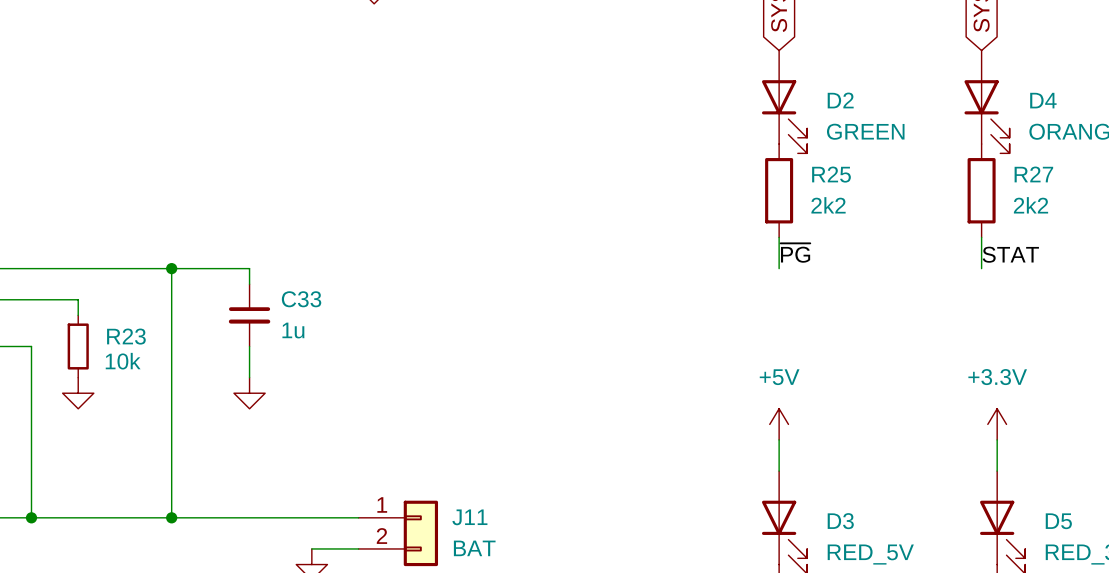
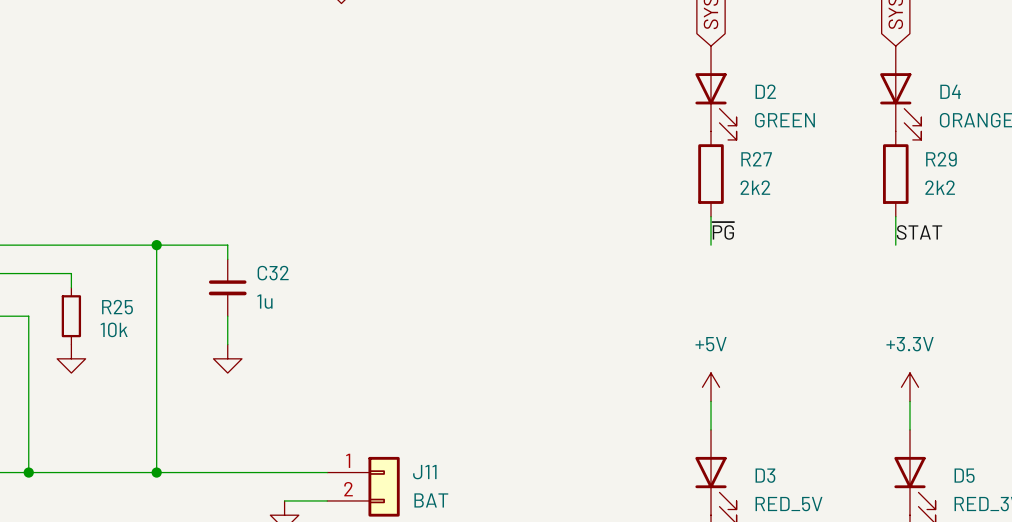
R25 name: R25 (831, 174) -> R27 (756, 159)
R27 name: R27 (1033, 174) -> R29 (941, 159)
C33 name: C33 (301, 299) -> C32 (273, 273)
R23 name: R23 (126, 336) -> R25 (117, 307)

